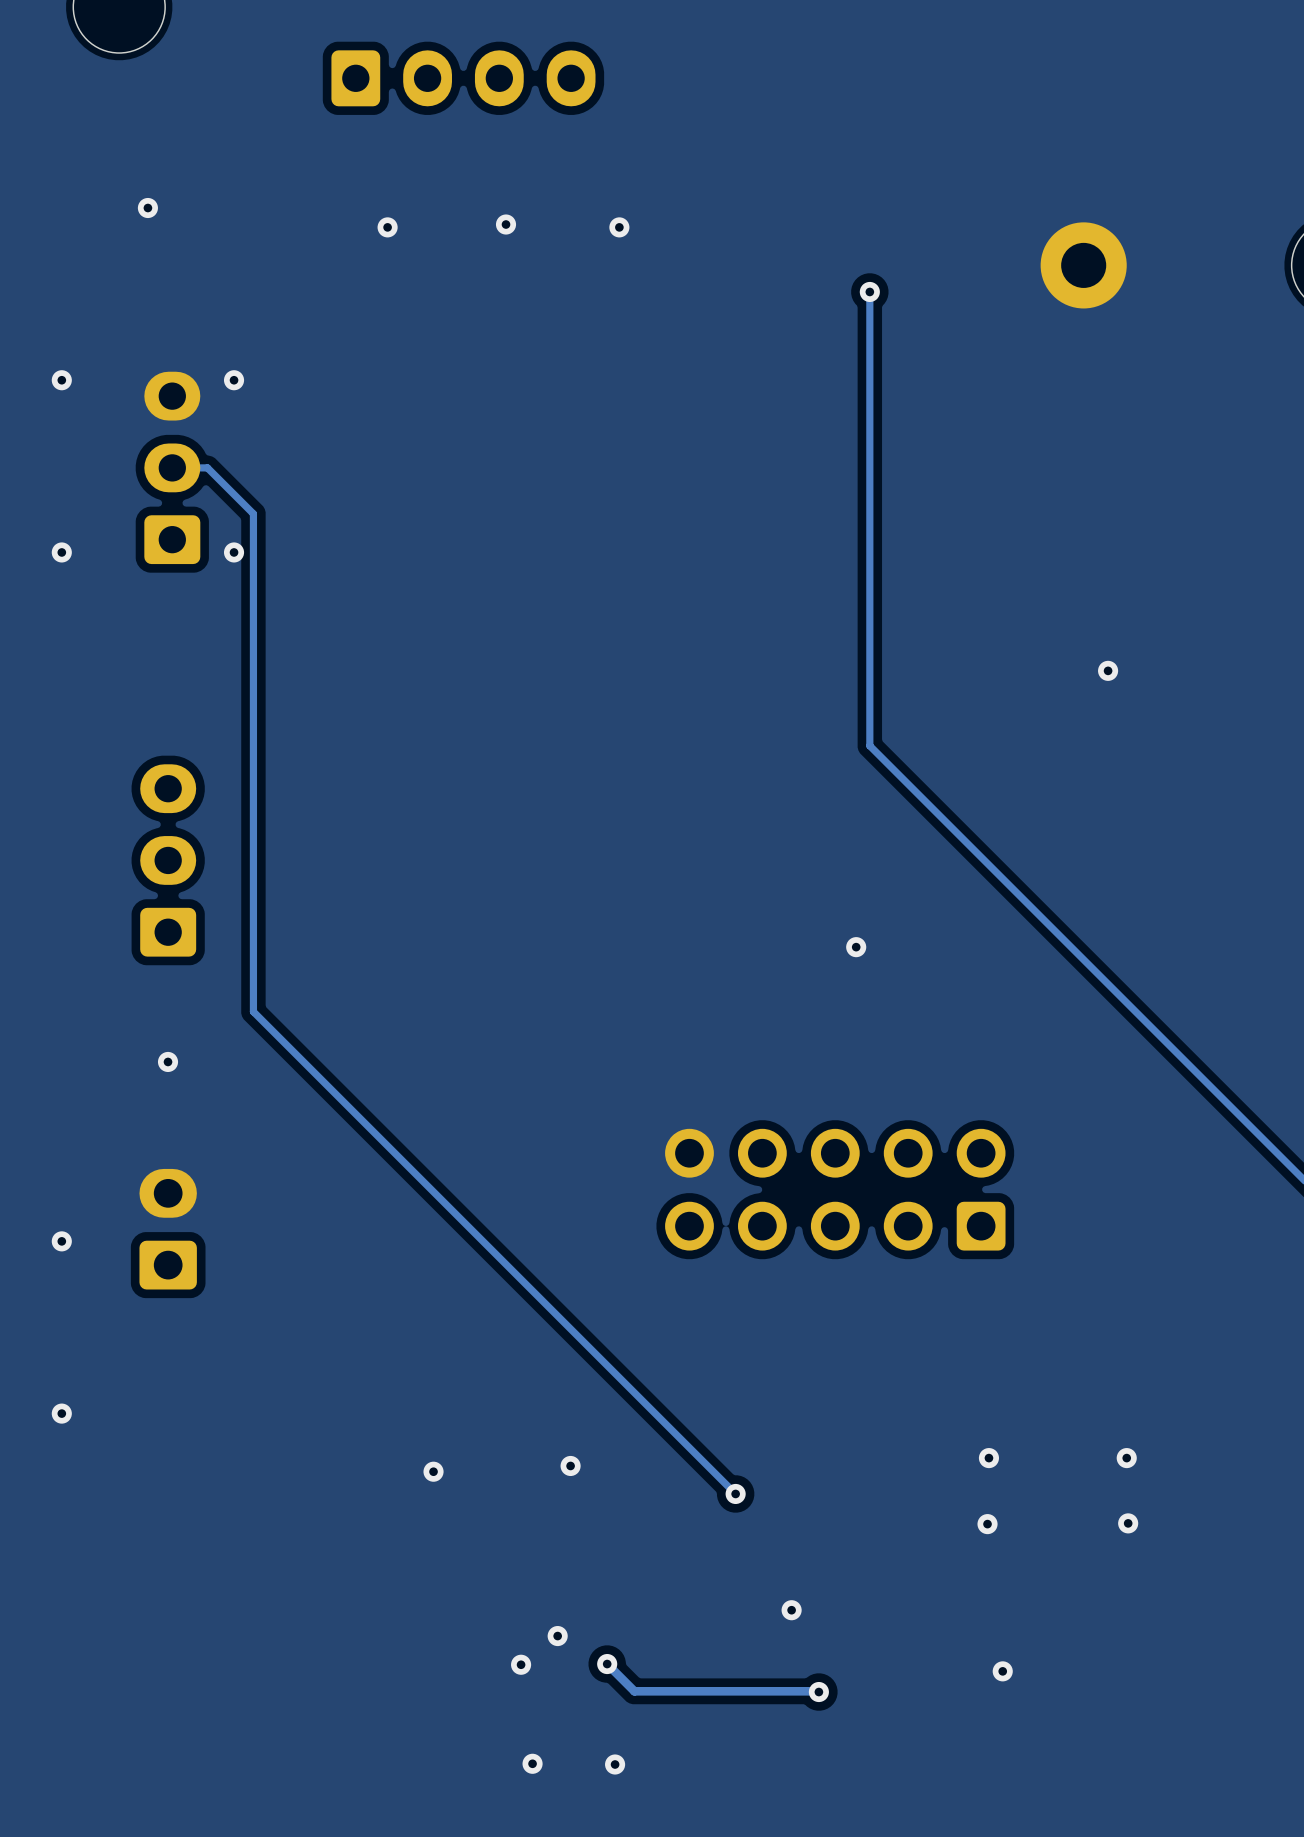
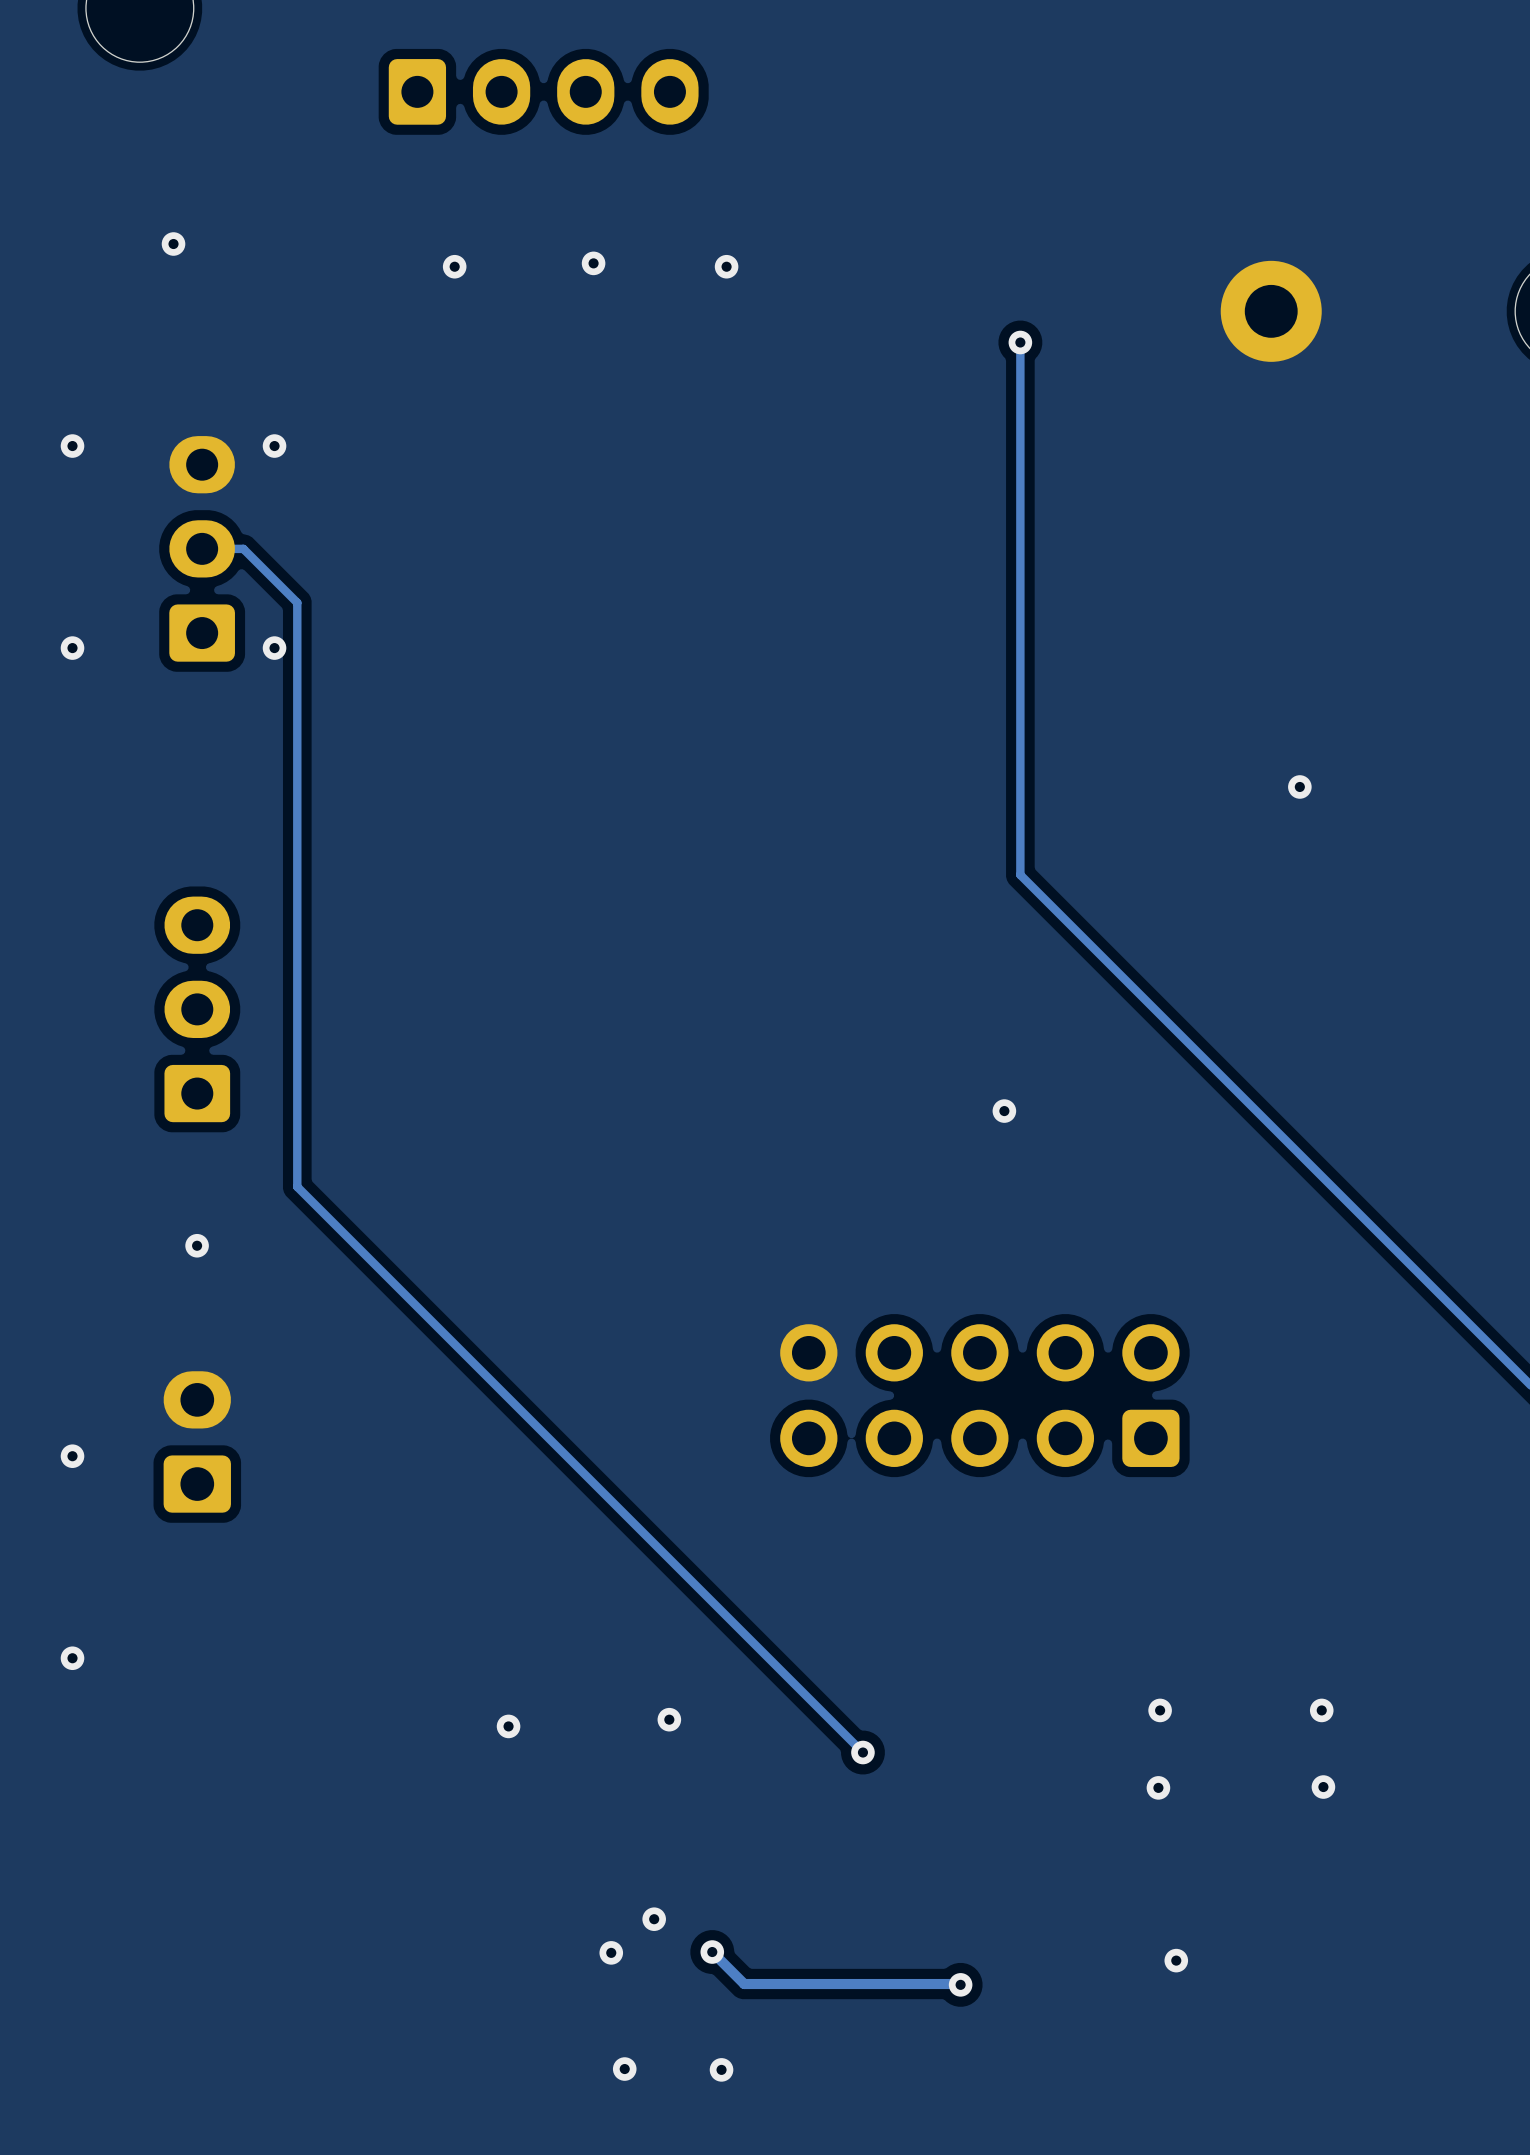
via: (791, 1610) -> none

